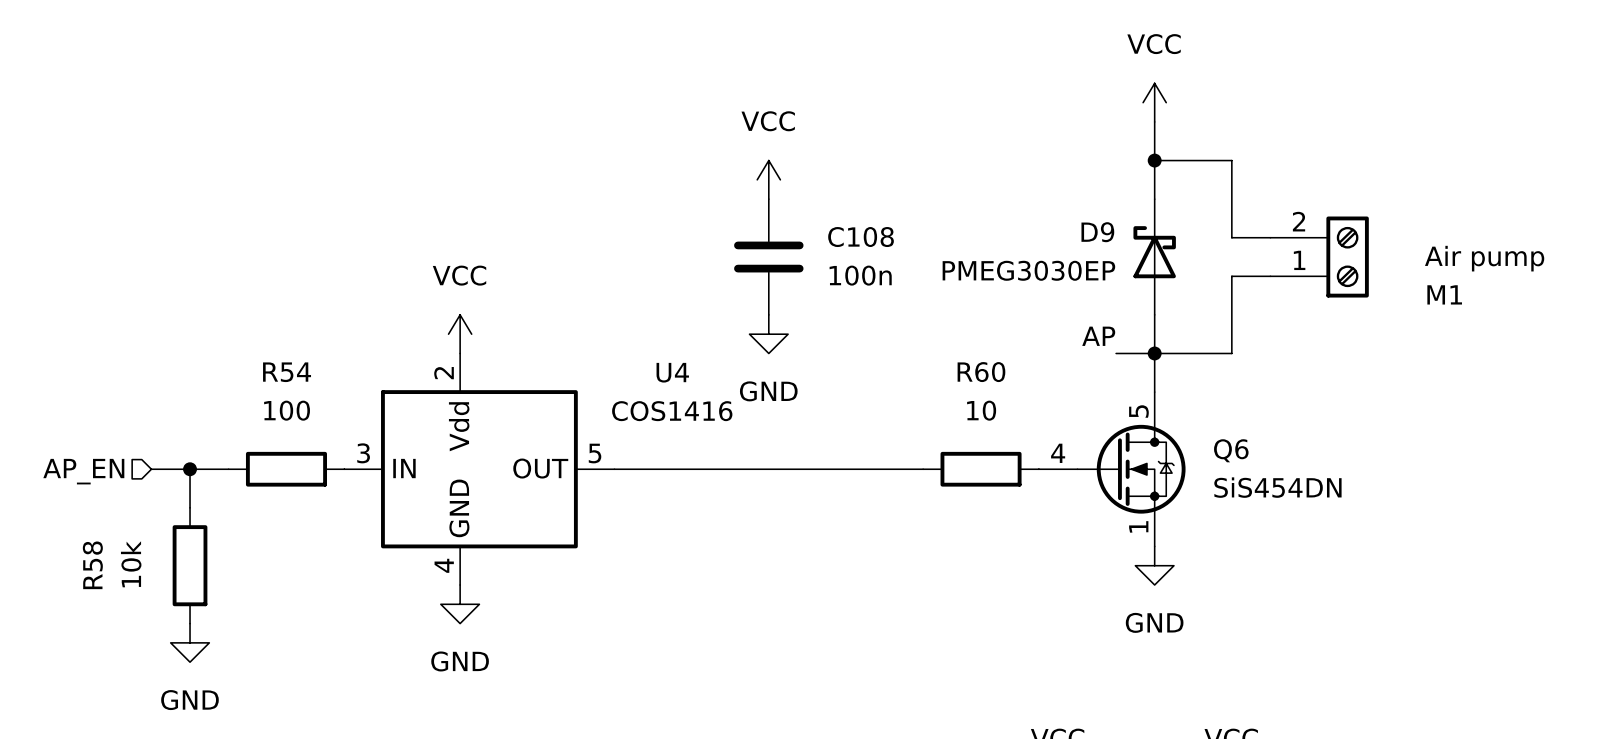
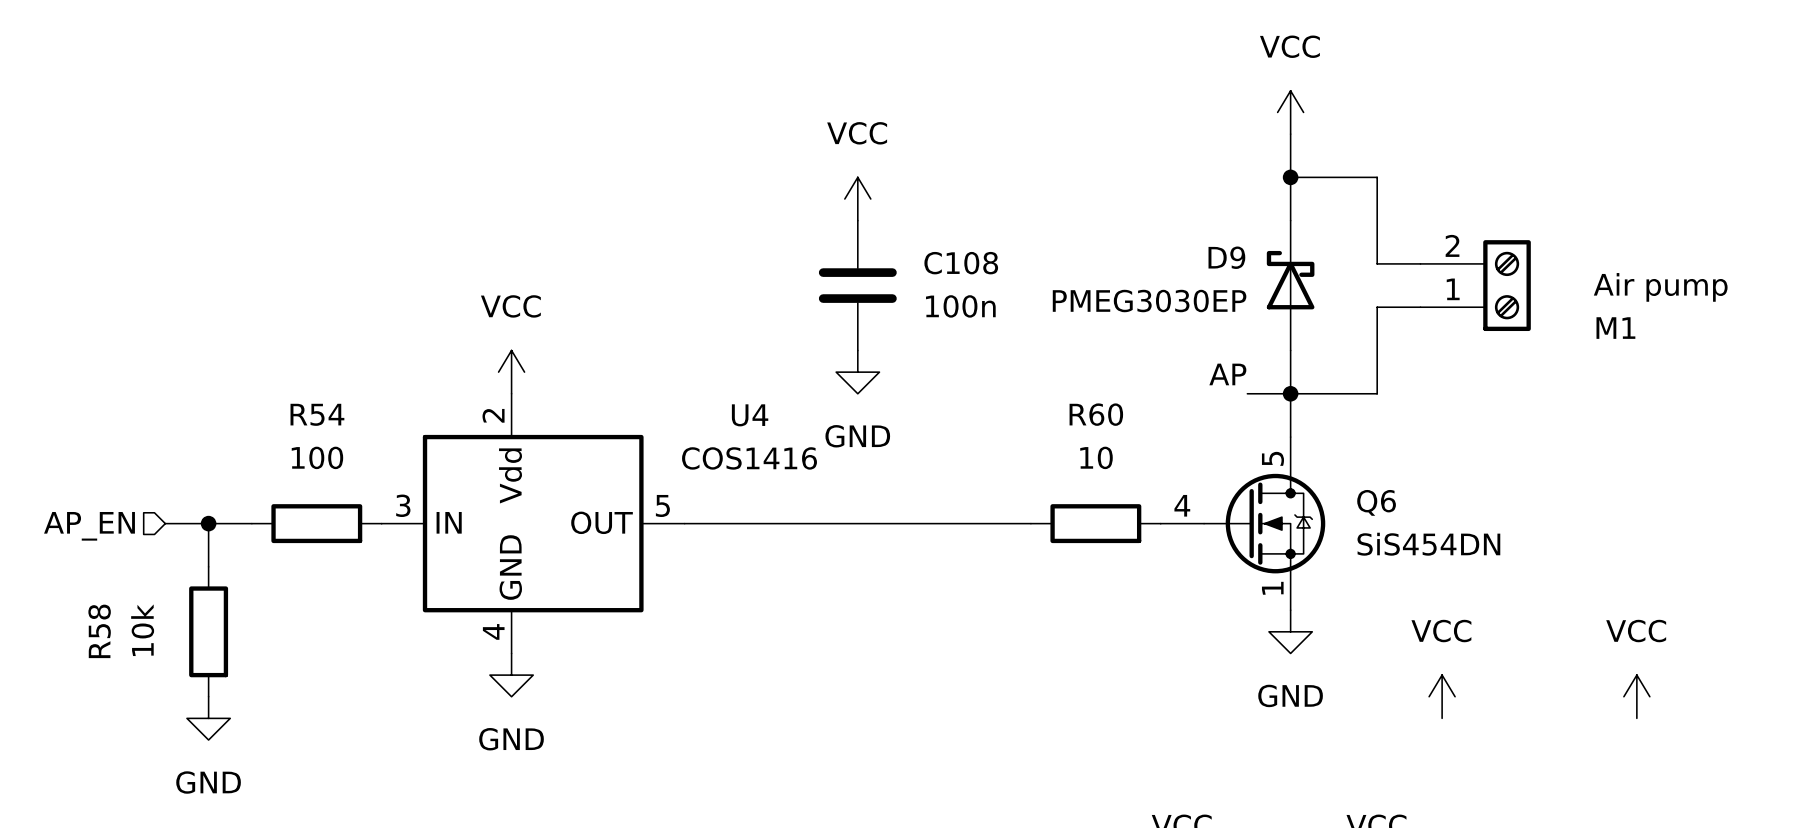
power symbol: none -> VCC (1442, 696)
power symbol: none -> VCC (1636, 696)

